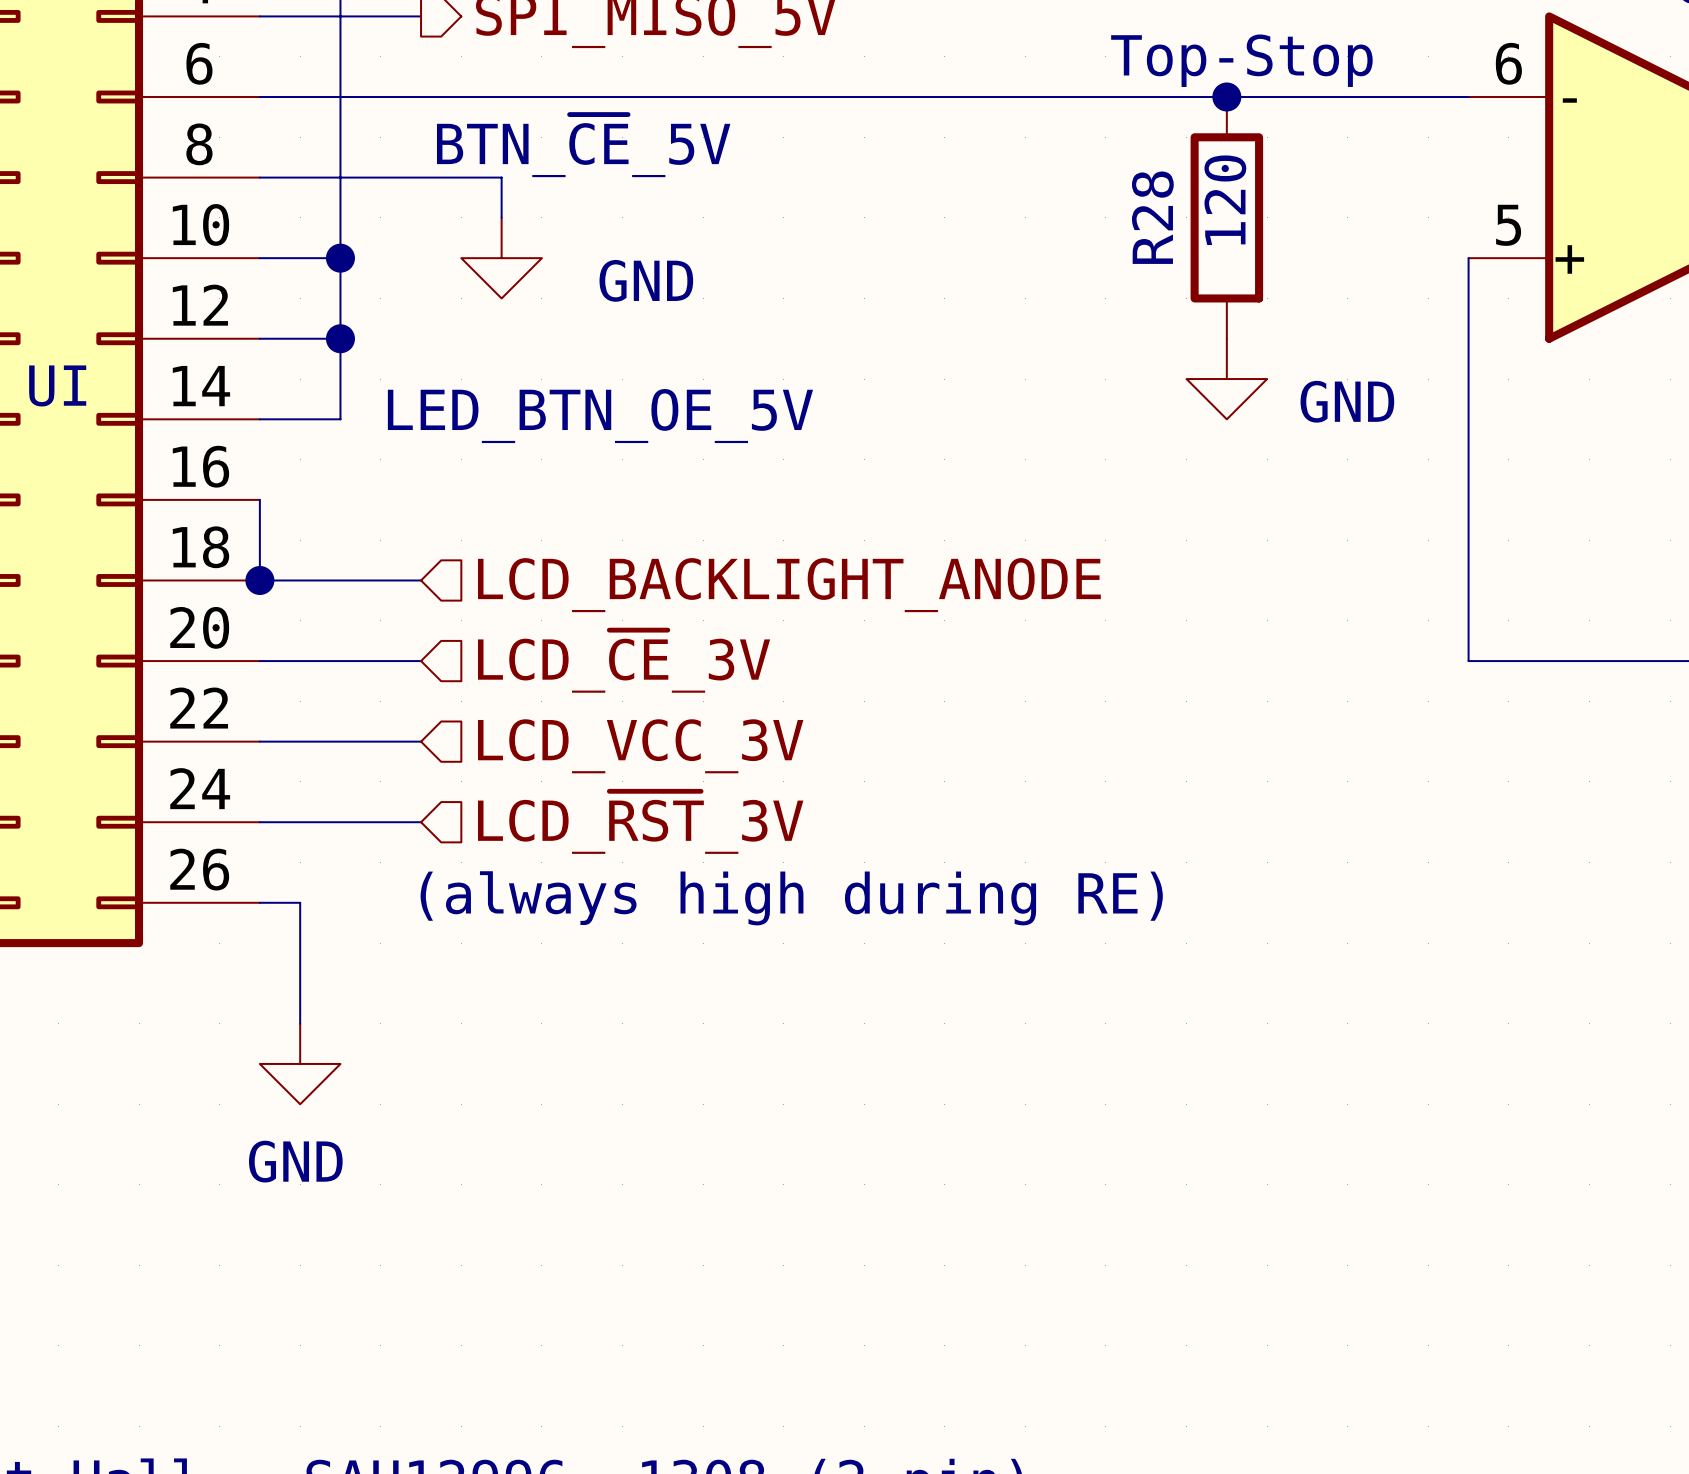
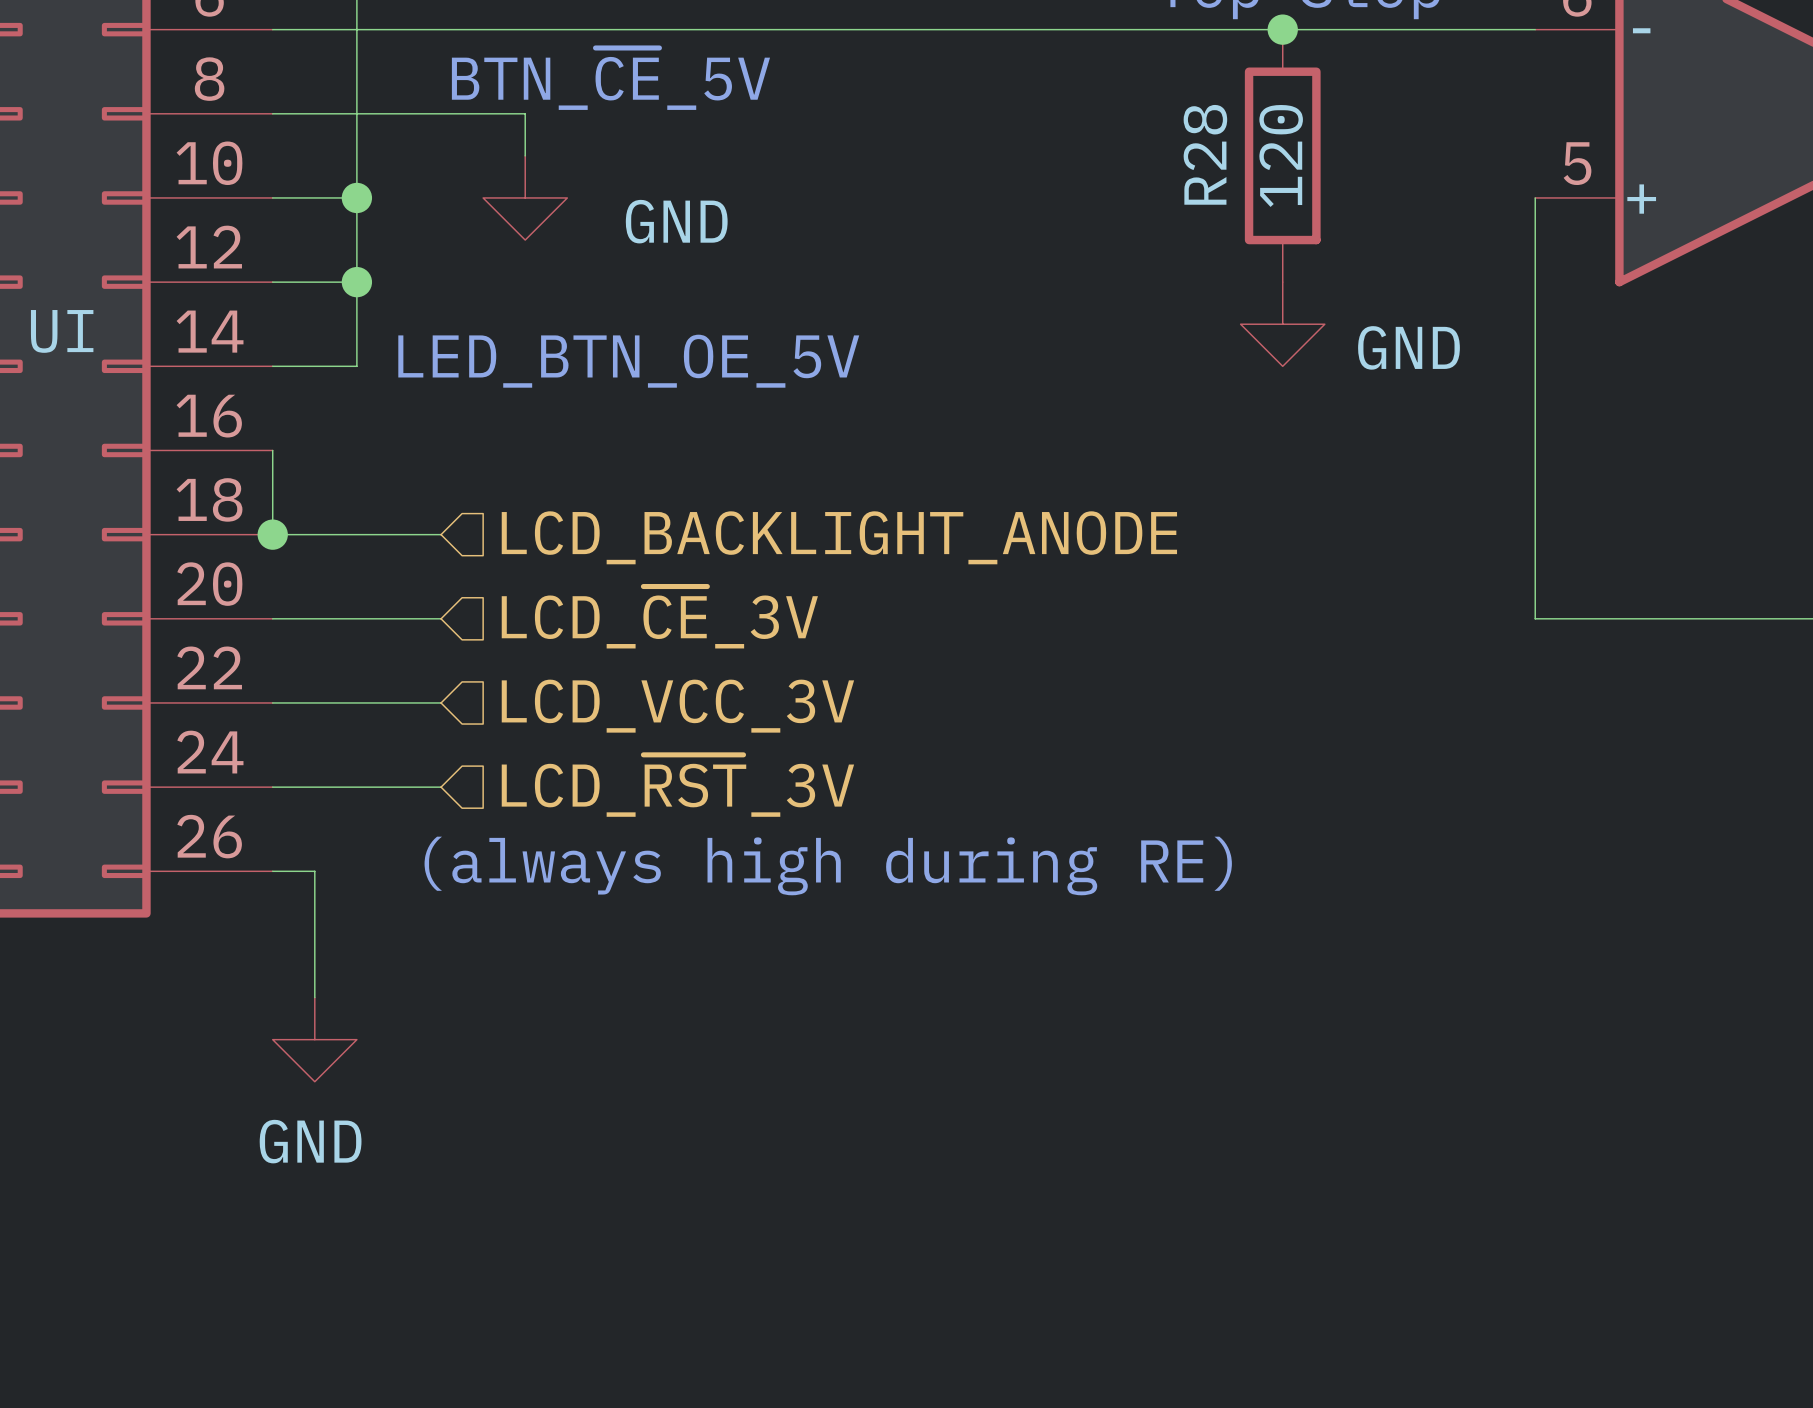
R28 value position: 120 (1225, 200) -> 120 (1281, 155)

